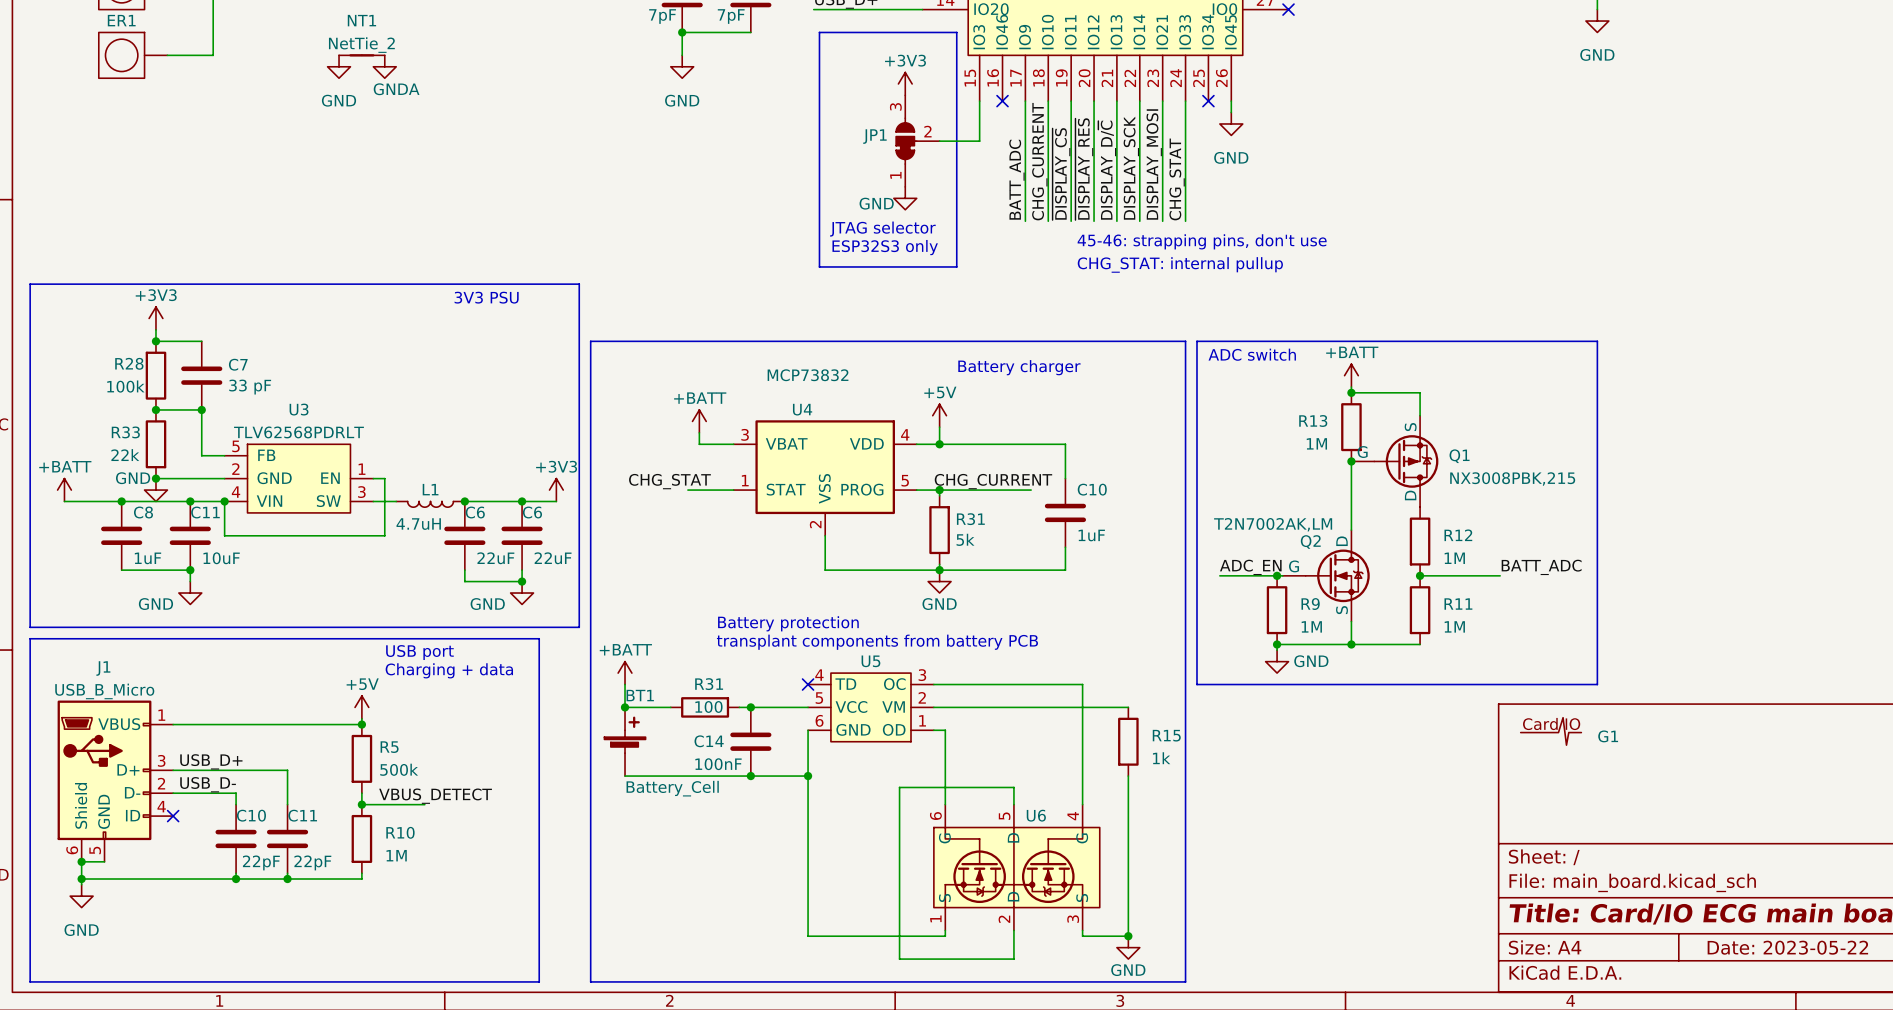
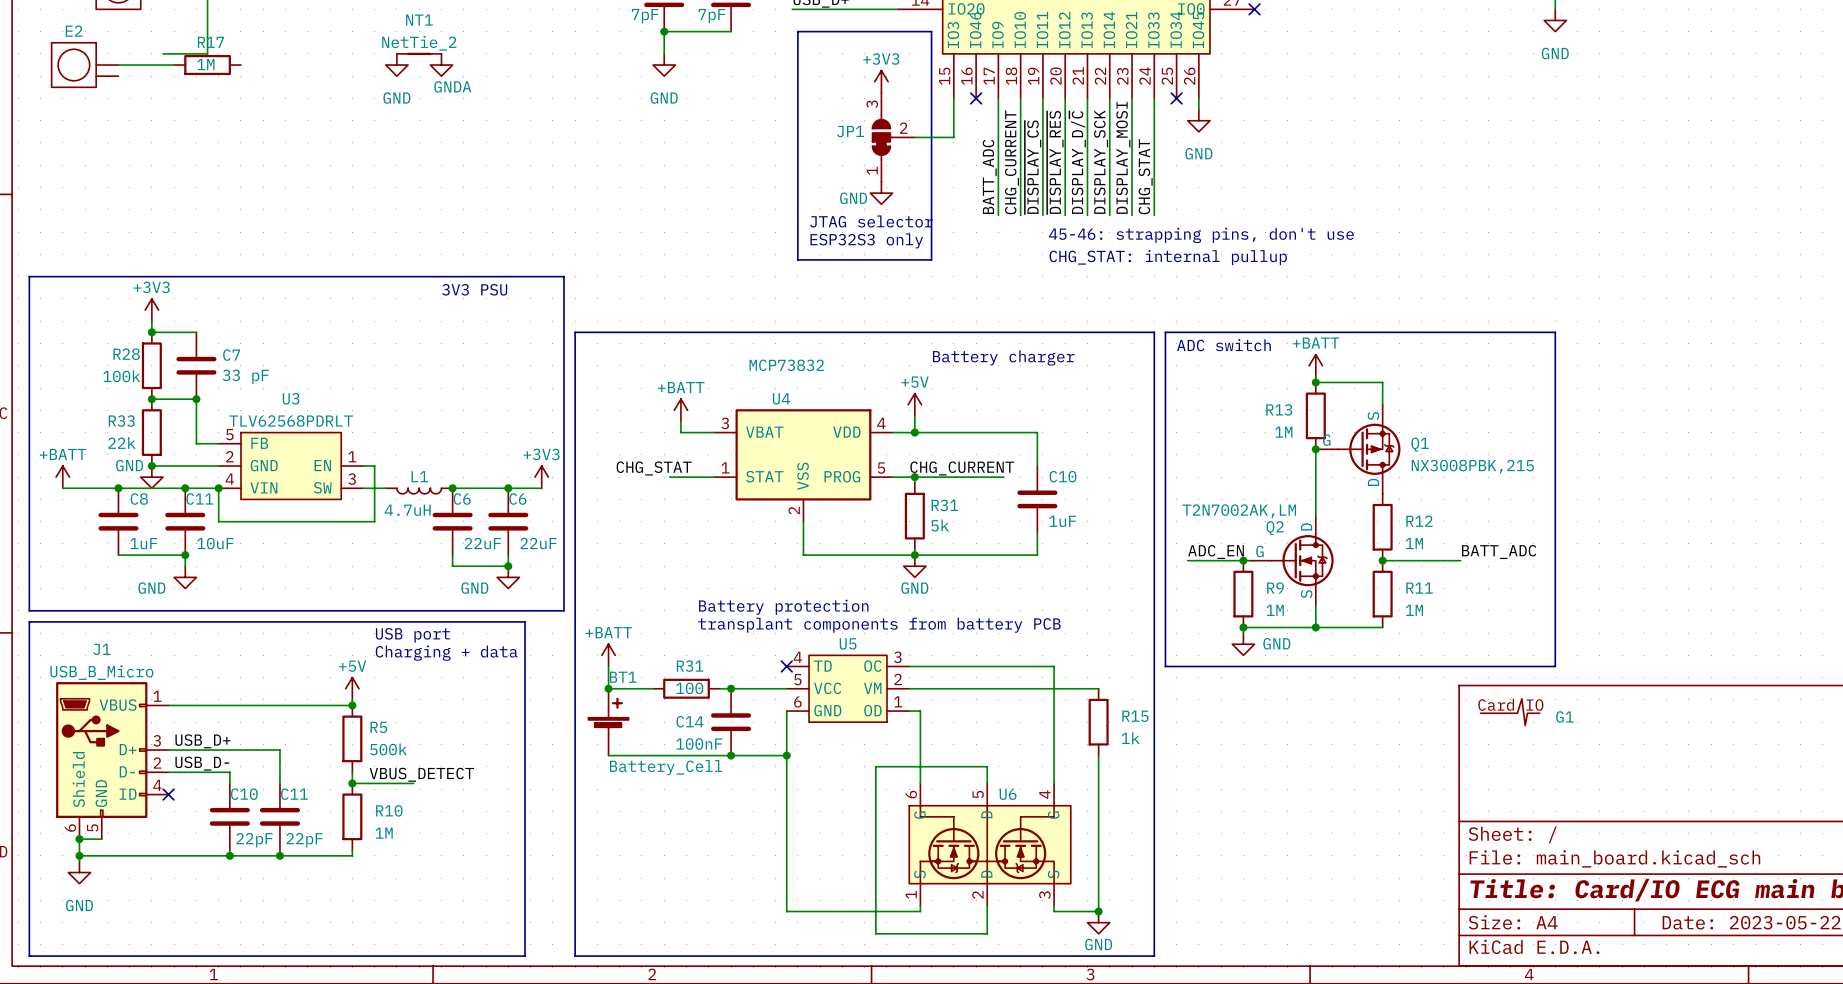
ER1: (133, 55) -> none
NT1 position: (361, 55) -> (419, 53)
E2: none -> (85, 65)
wire: none -> (118, 65) (174, 65)
R17: none -> 1M (207, 65)
power symbol position: GND (339, 66) -> GND (396, 65)
power symbol: GNDA (384, 66) -> none
power symbol: none -> GNDA (441, 65)

